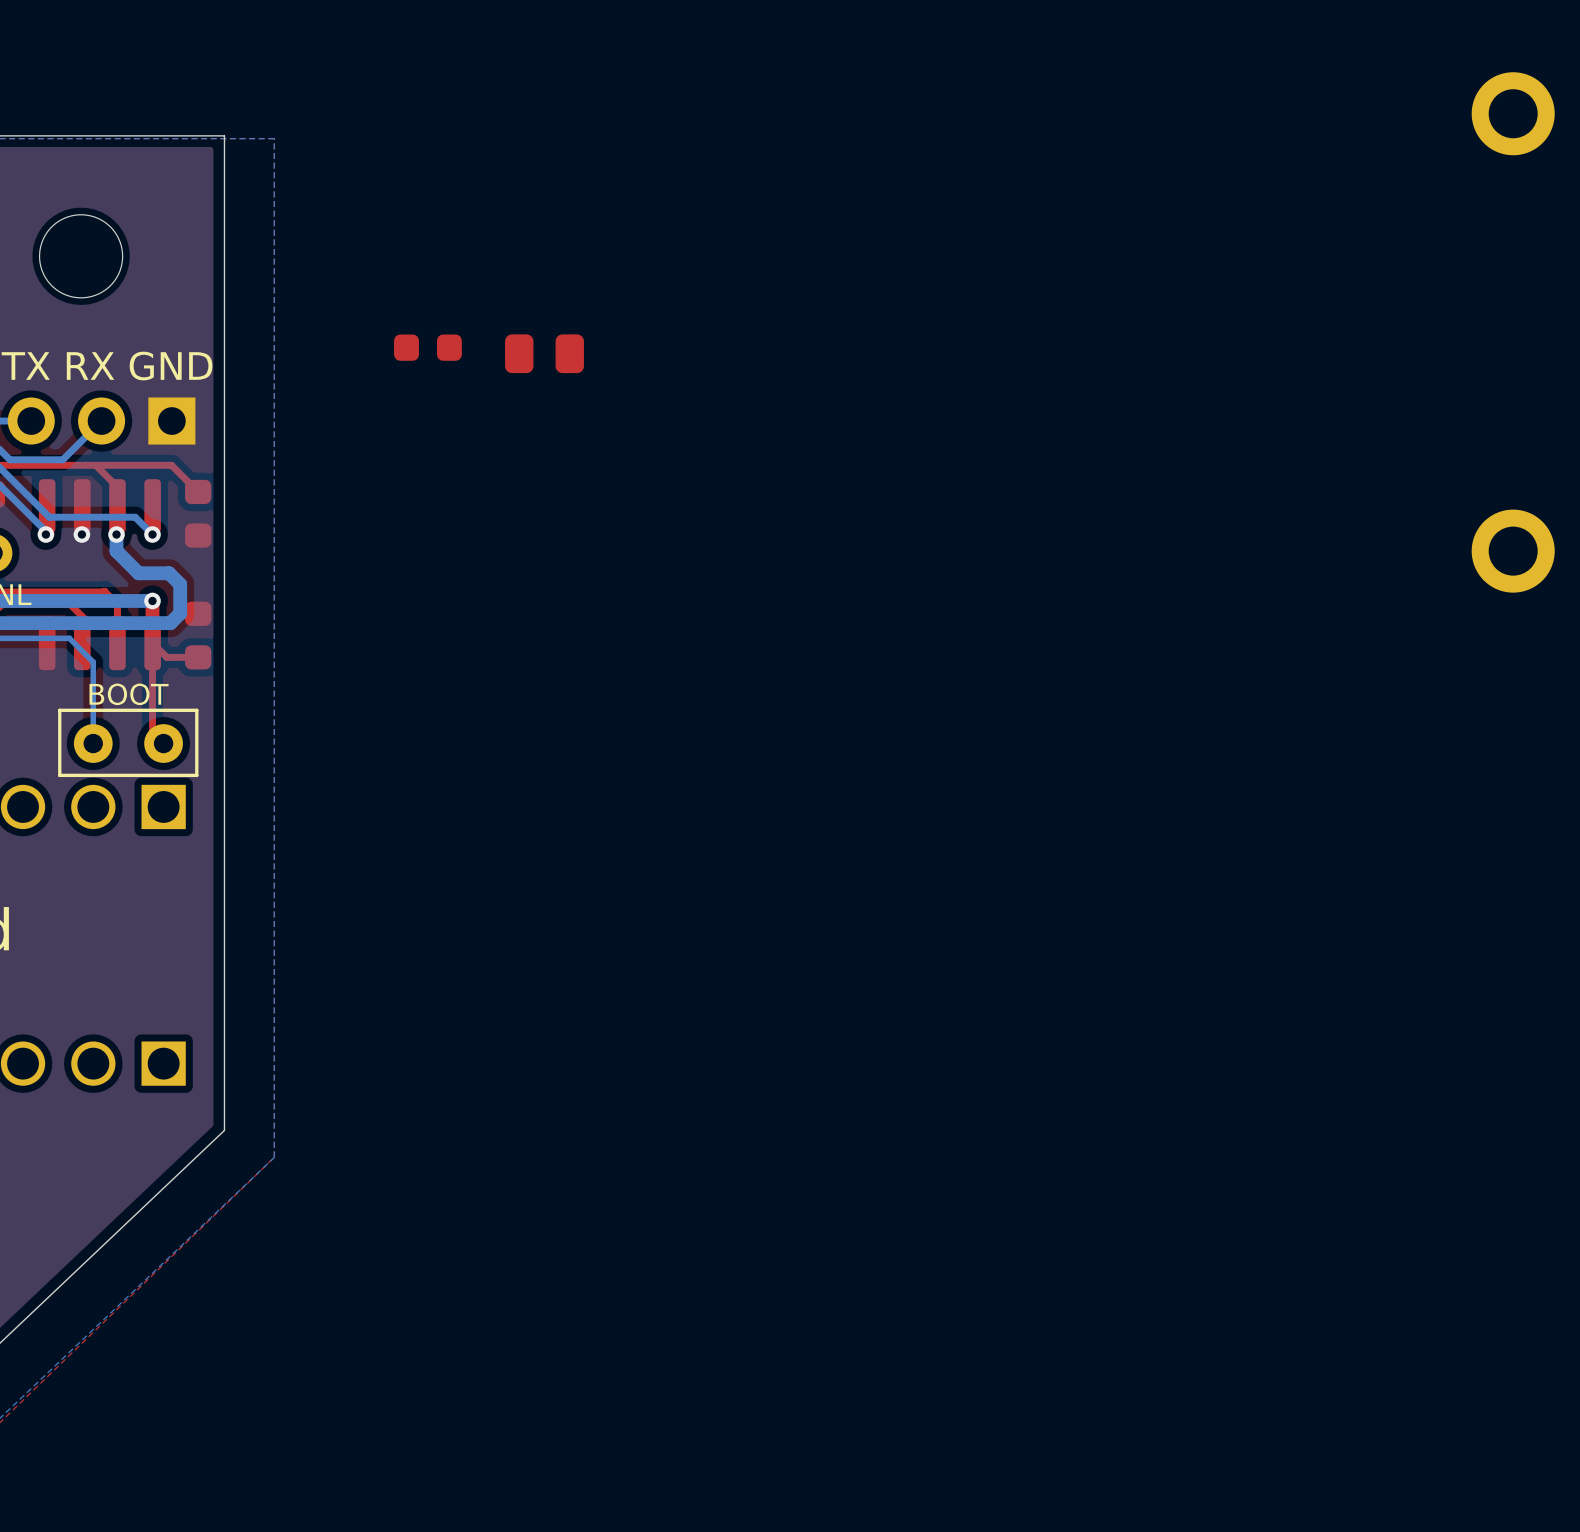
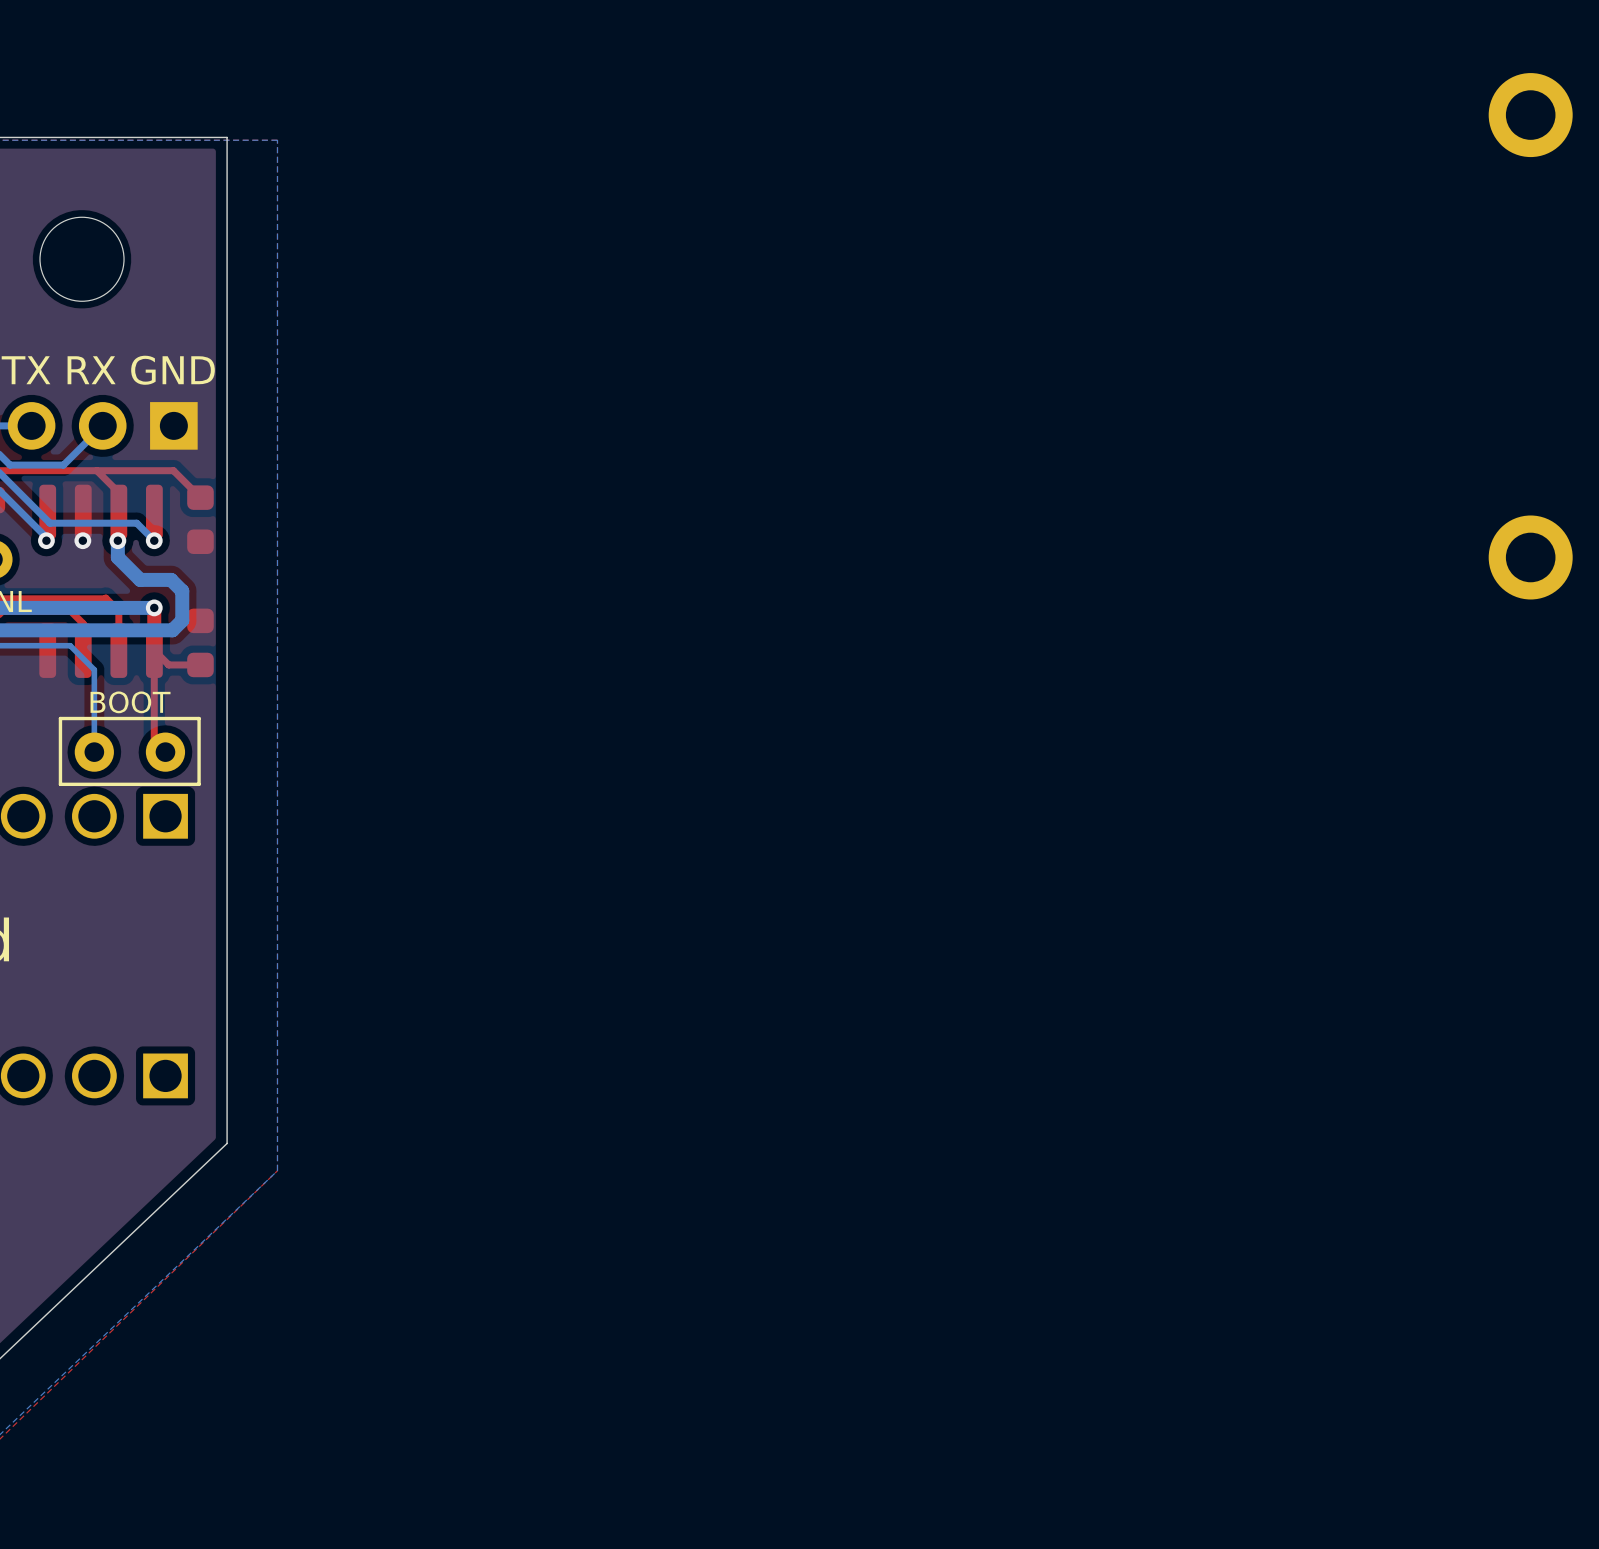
part: (427, 347) -> none
part: (544, 353) -> none

